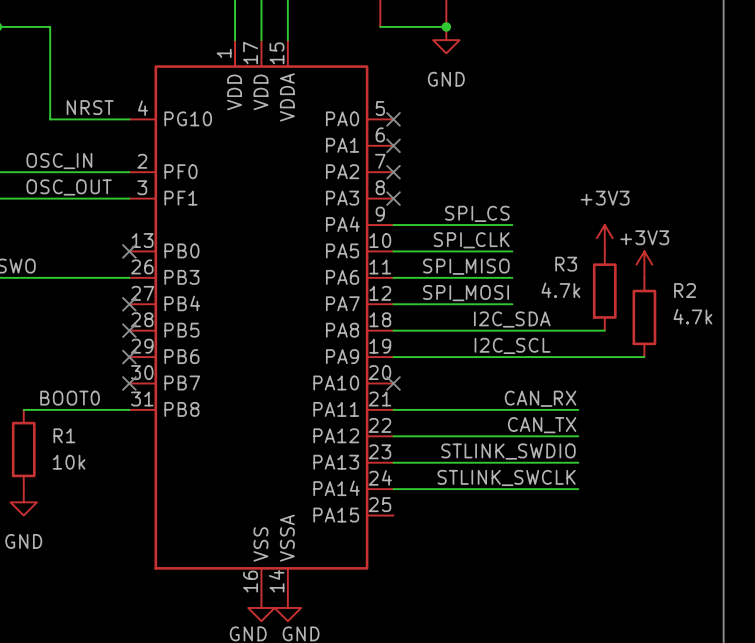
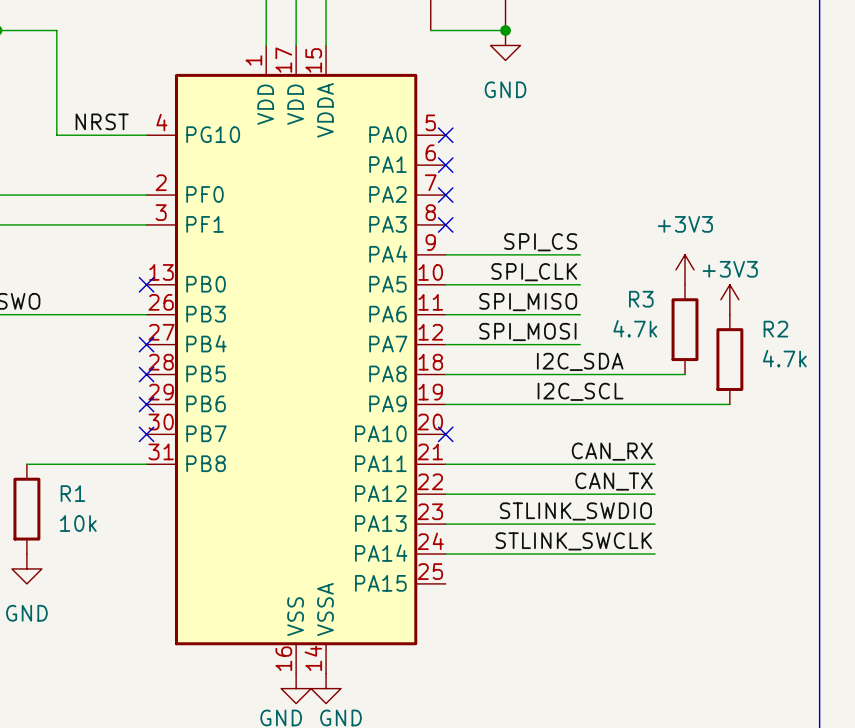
label: OSC_IN (59, 161) -> none
label: OSC_OUT (69, 187) -> none
label: BOOT0 (70, 398) -> none

